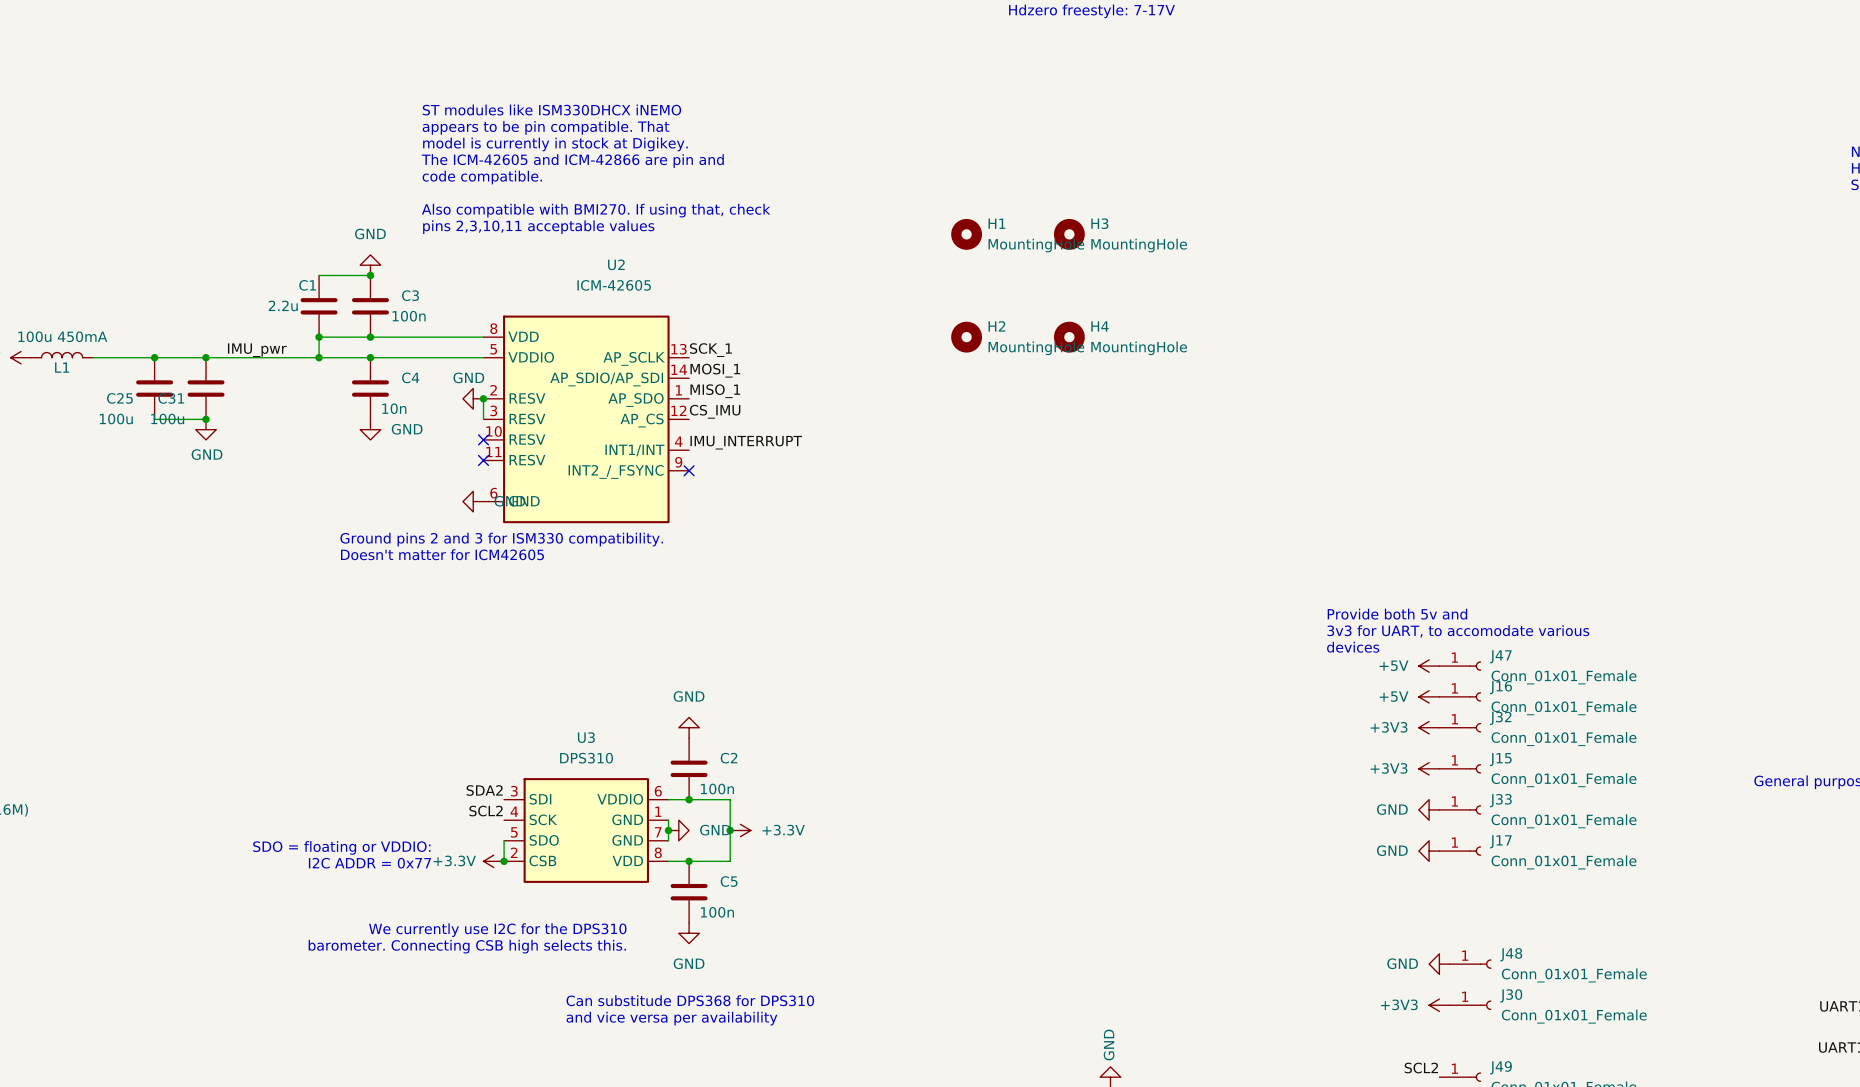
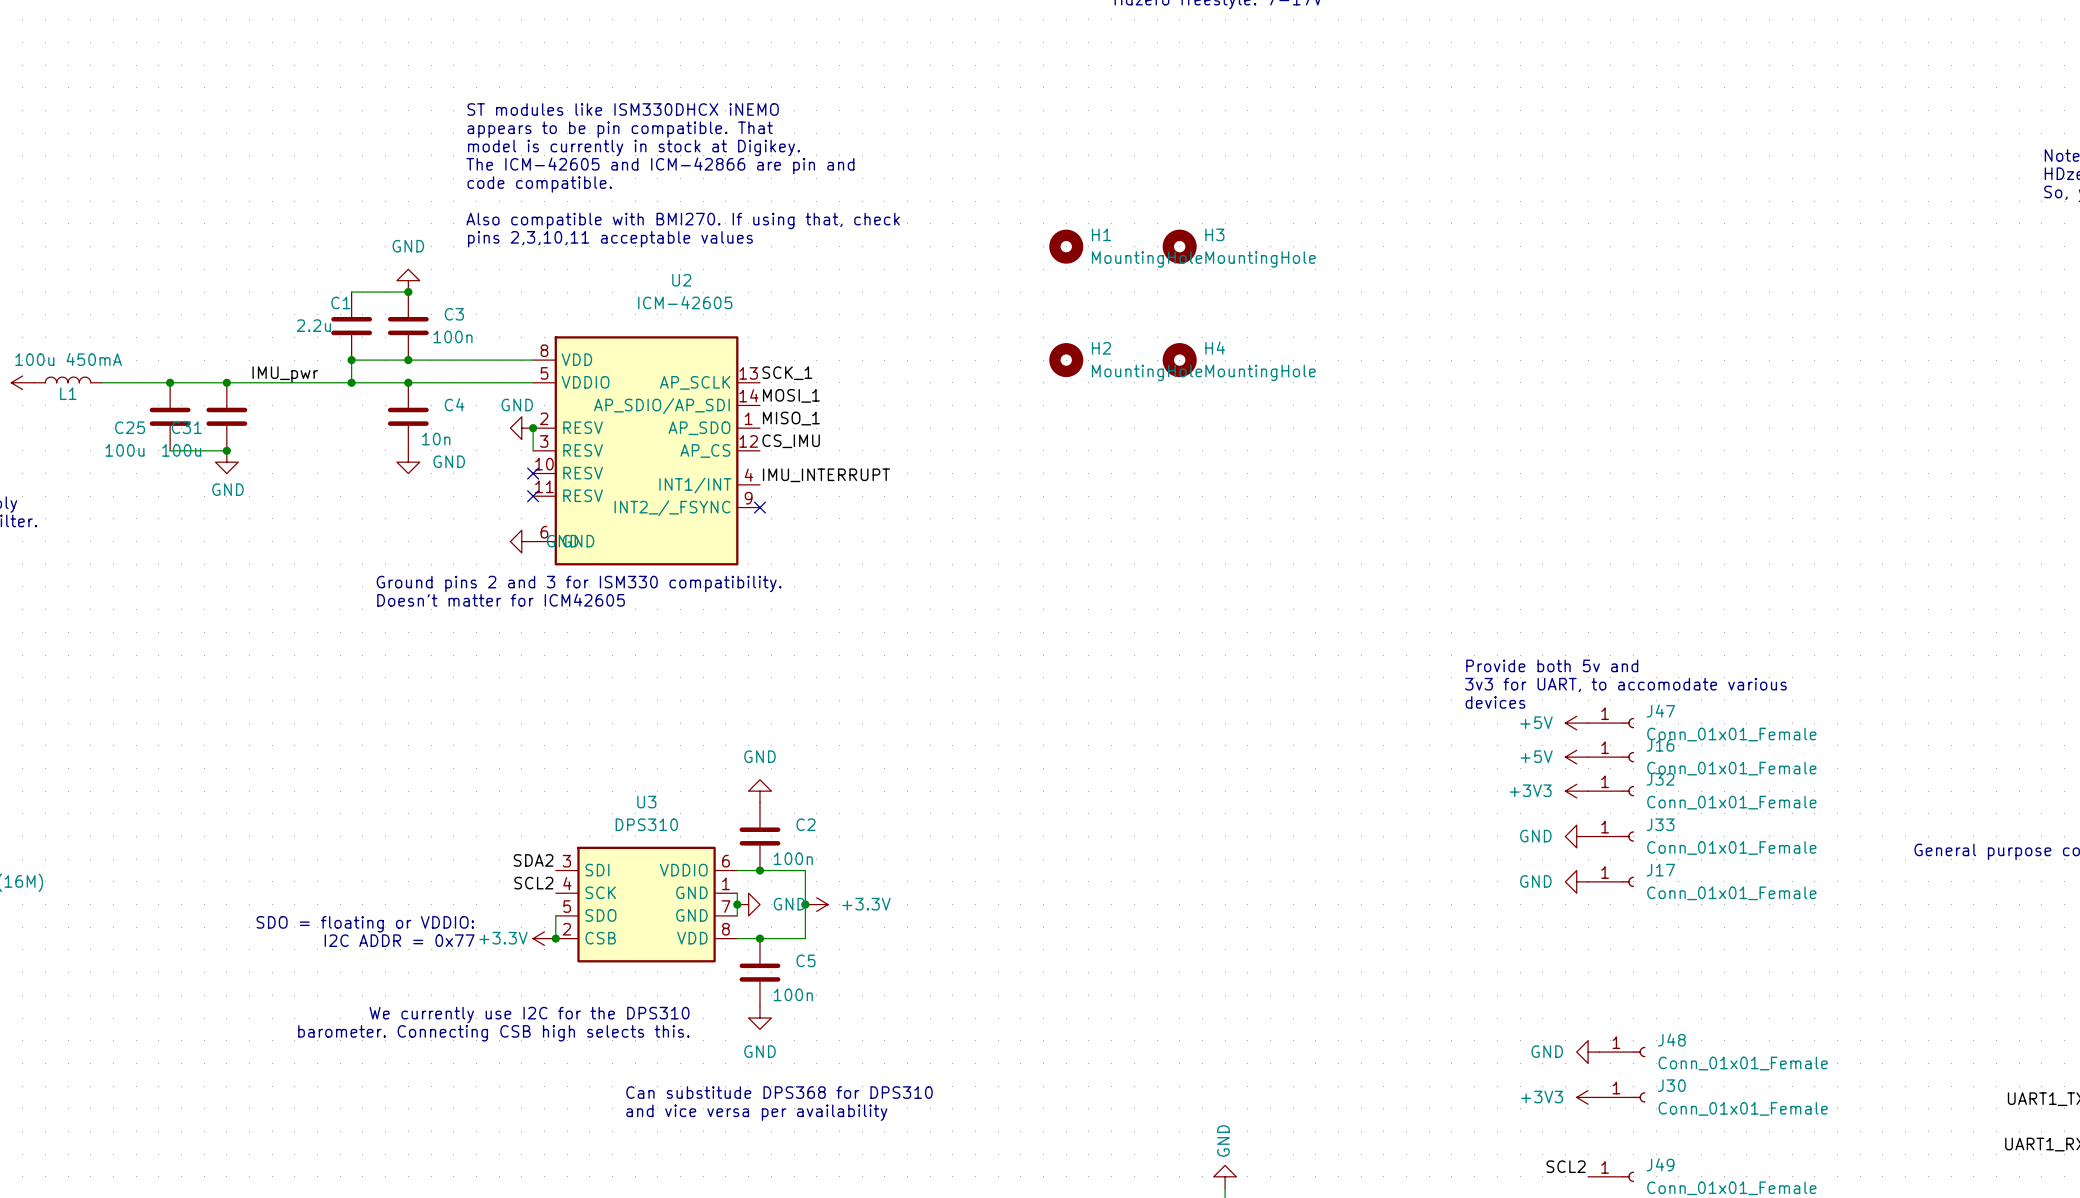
J15 name: J15 (1500, 759) -> J33 (1660, 824)
power symbol: +3V3 (1429, 768) -> GND (1576, 836)
J33 name: J33 (1500, 800) -> J17 (1660, 870)
power symbol: GND (1429, 851) -> none
J17: Conn_01x01_Female (1460, 851) -> none

